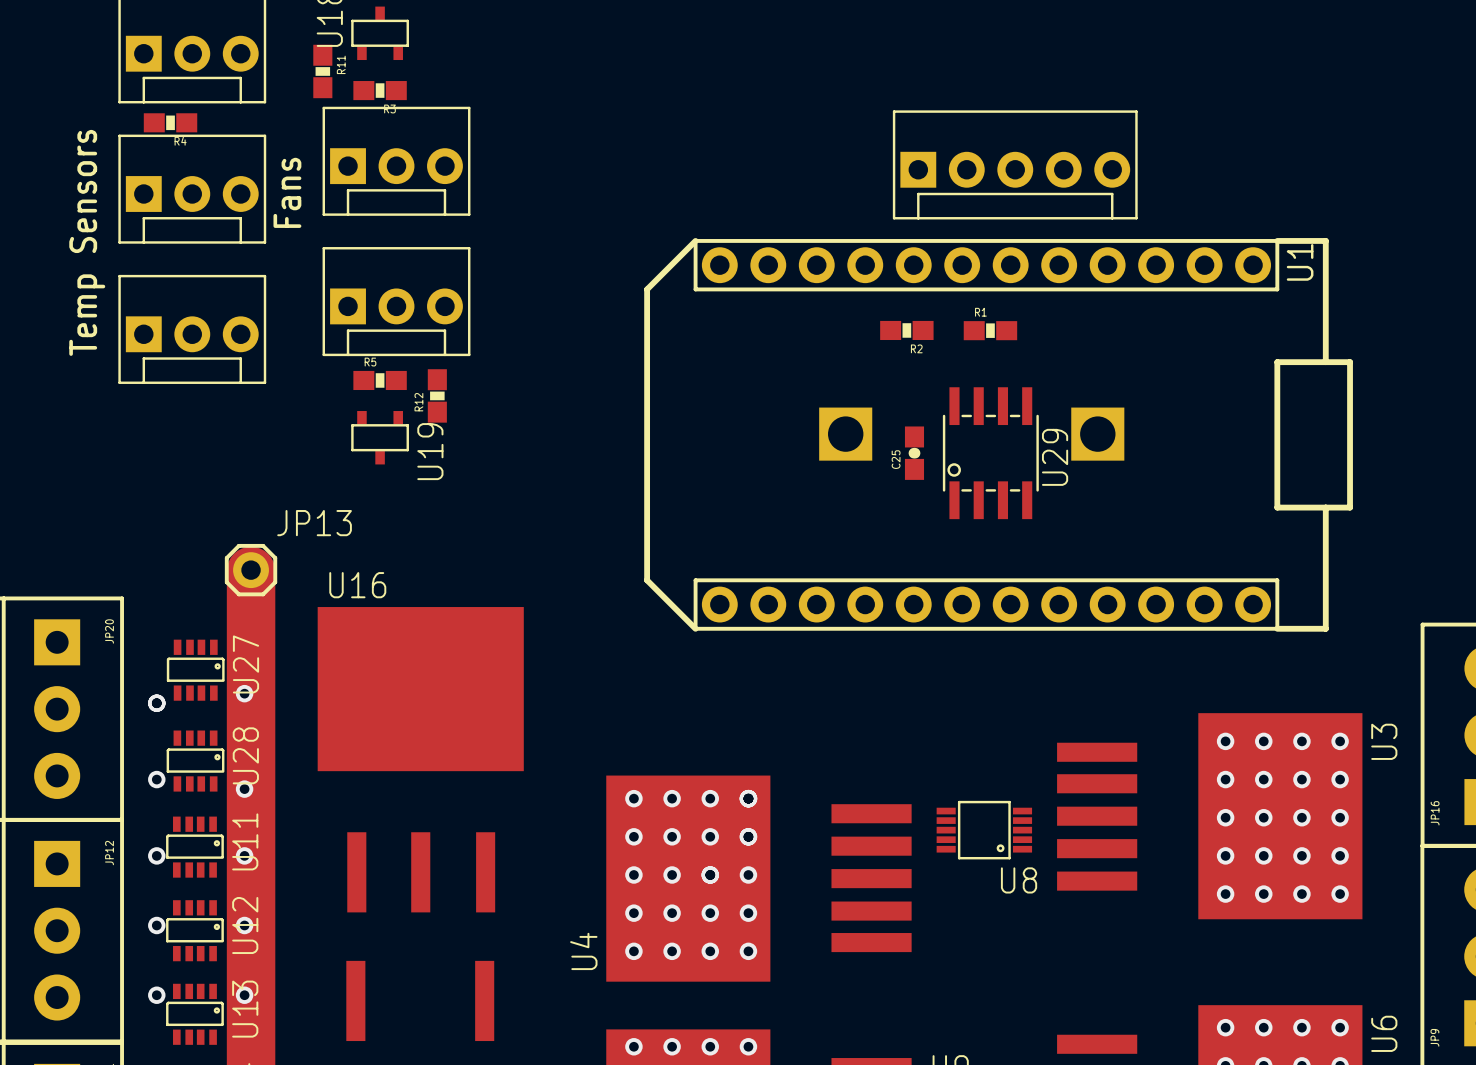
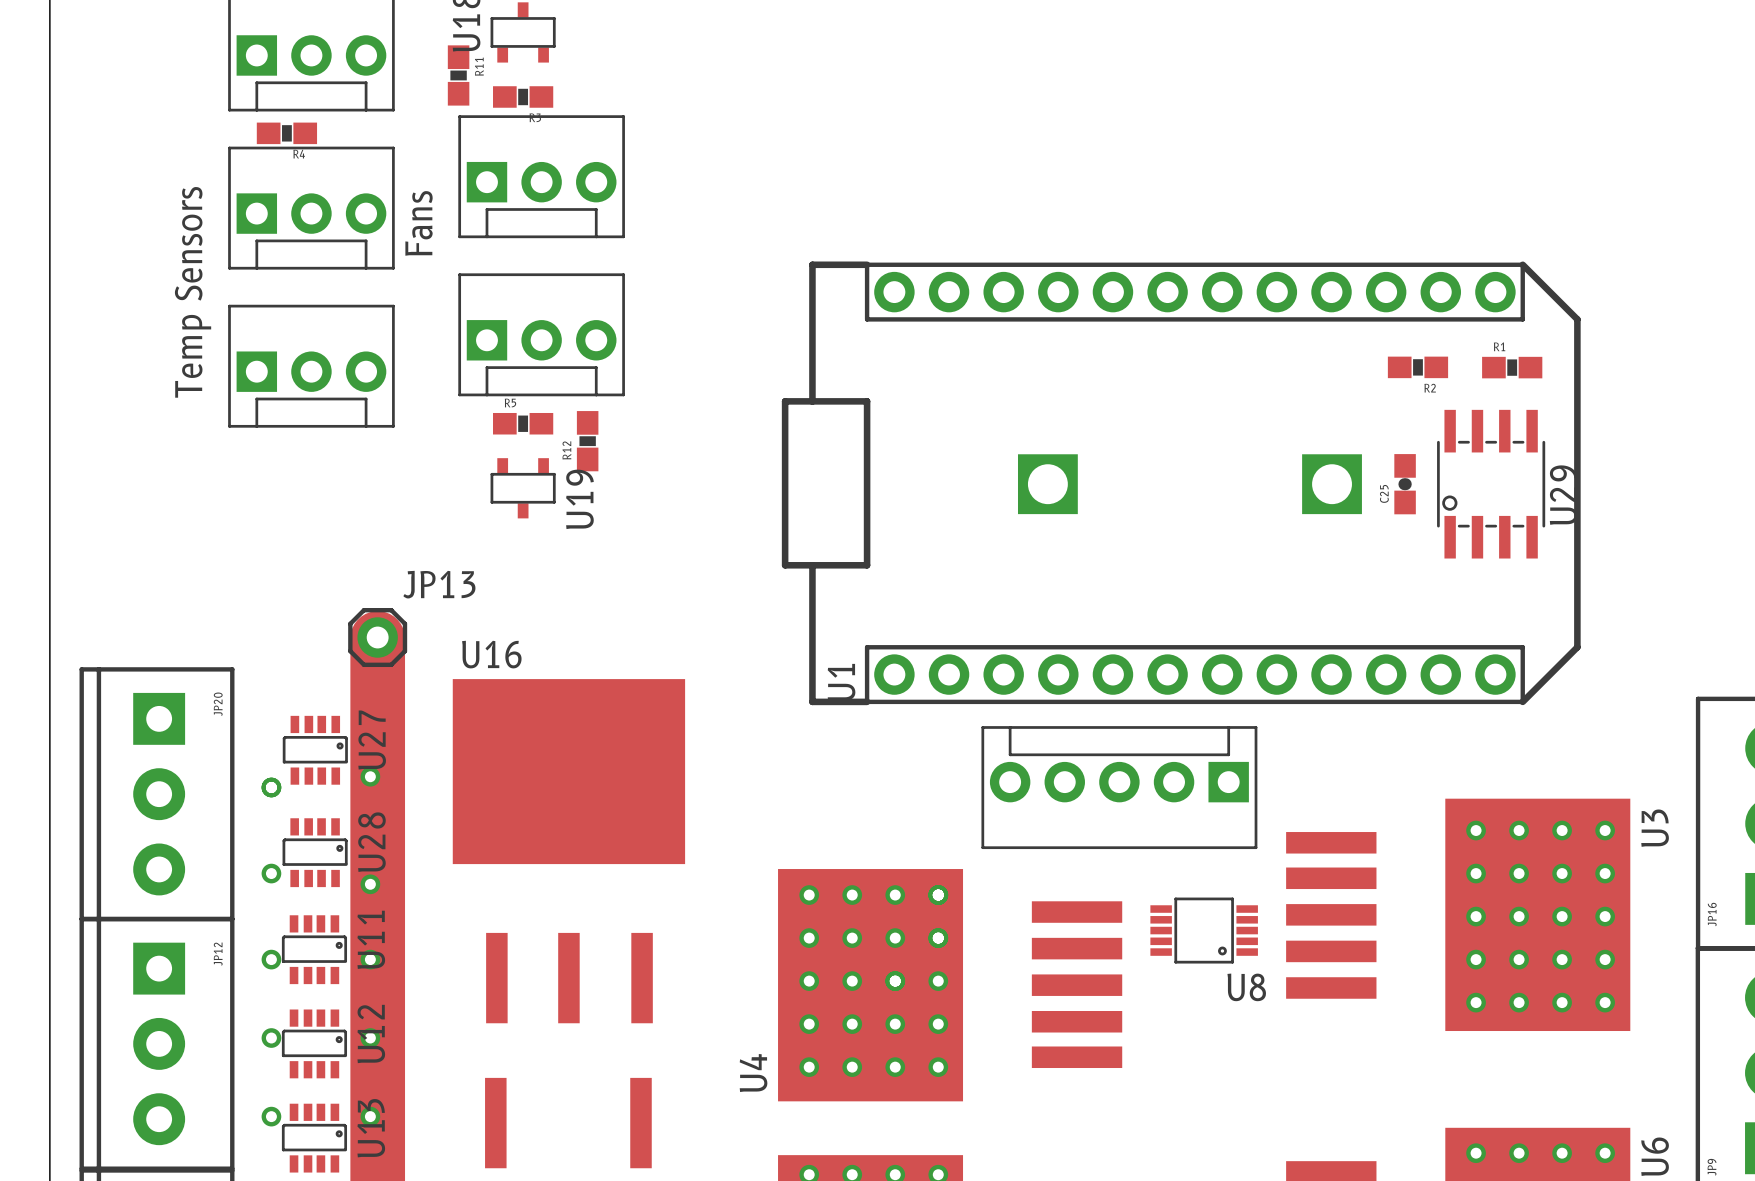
part: (1015, 164) -> none
R2 position: (906, 330) -> (1417, 367)
R1 position: (990, 330) -> (1512, 367)
U1 rotation: 0° (998, 434) -> 180° (1181, 483)
C25 position: (914, 453) -> (1405, 484)
U29 position: (990, 453) -> (1491, 484)
part: none -> (1119, 787)

